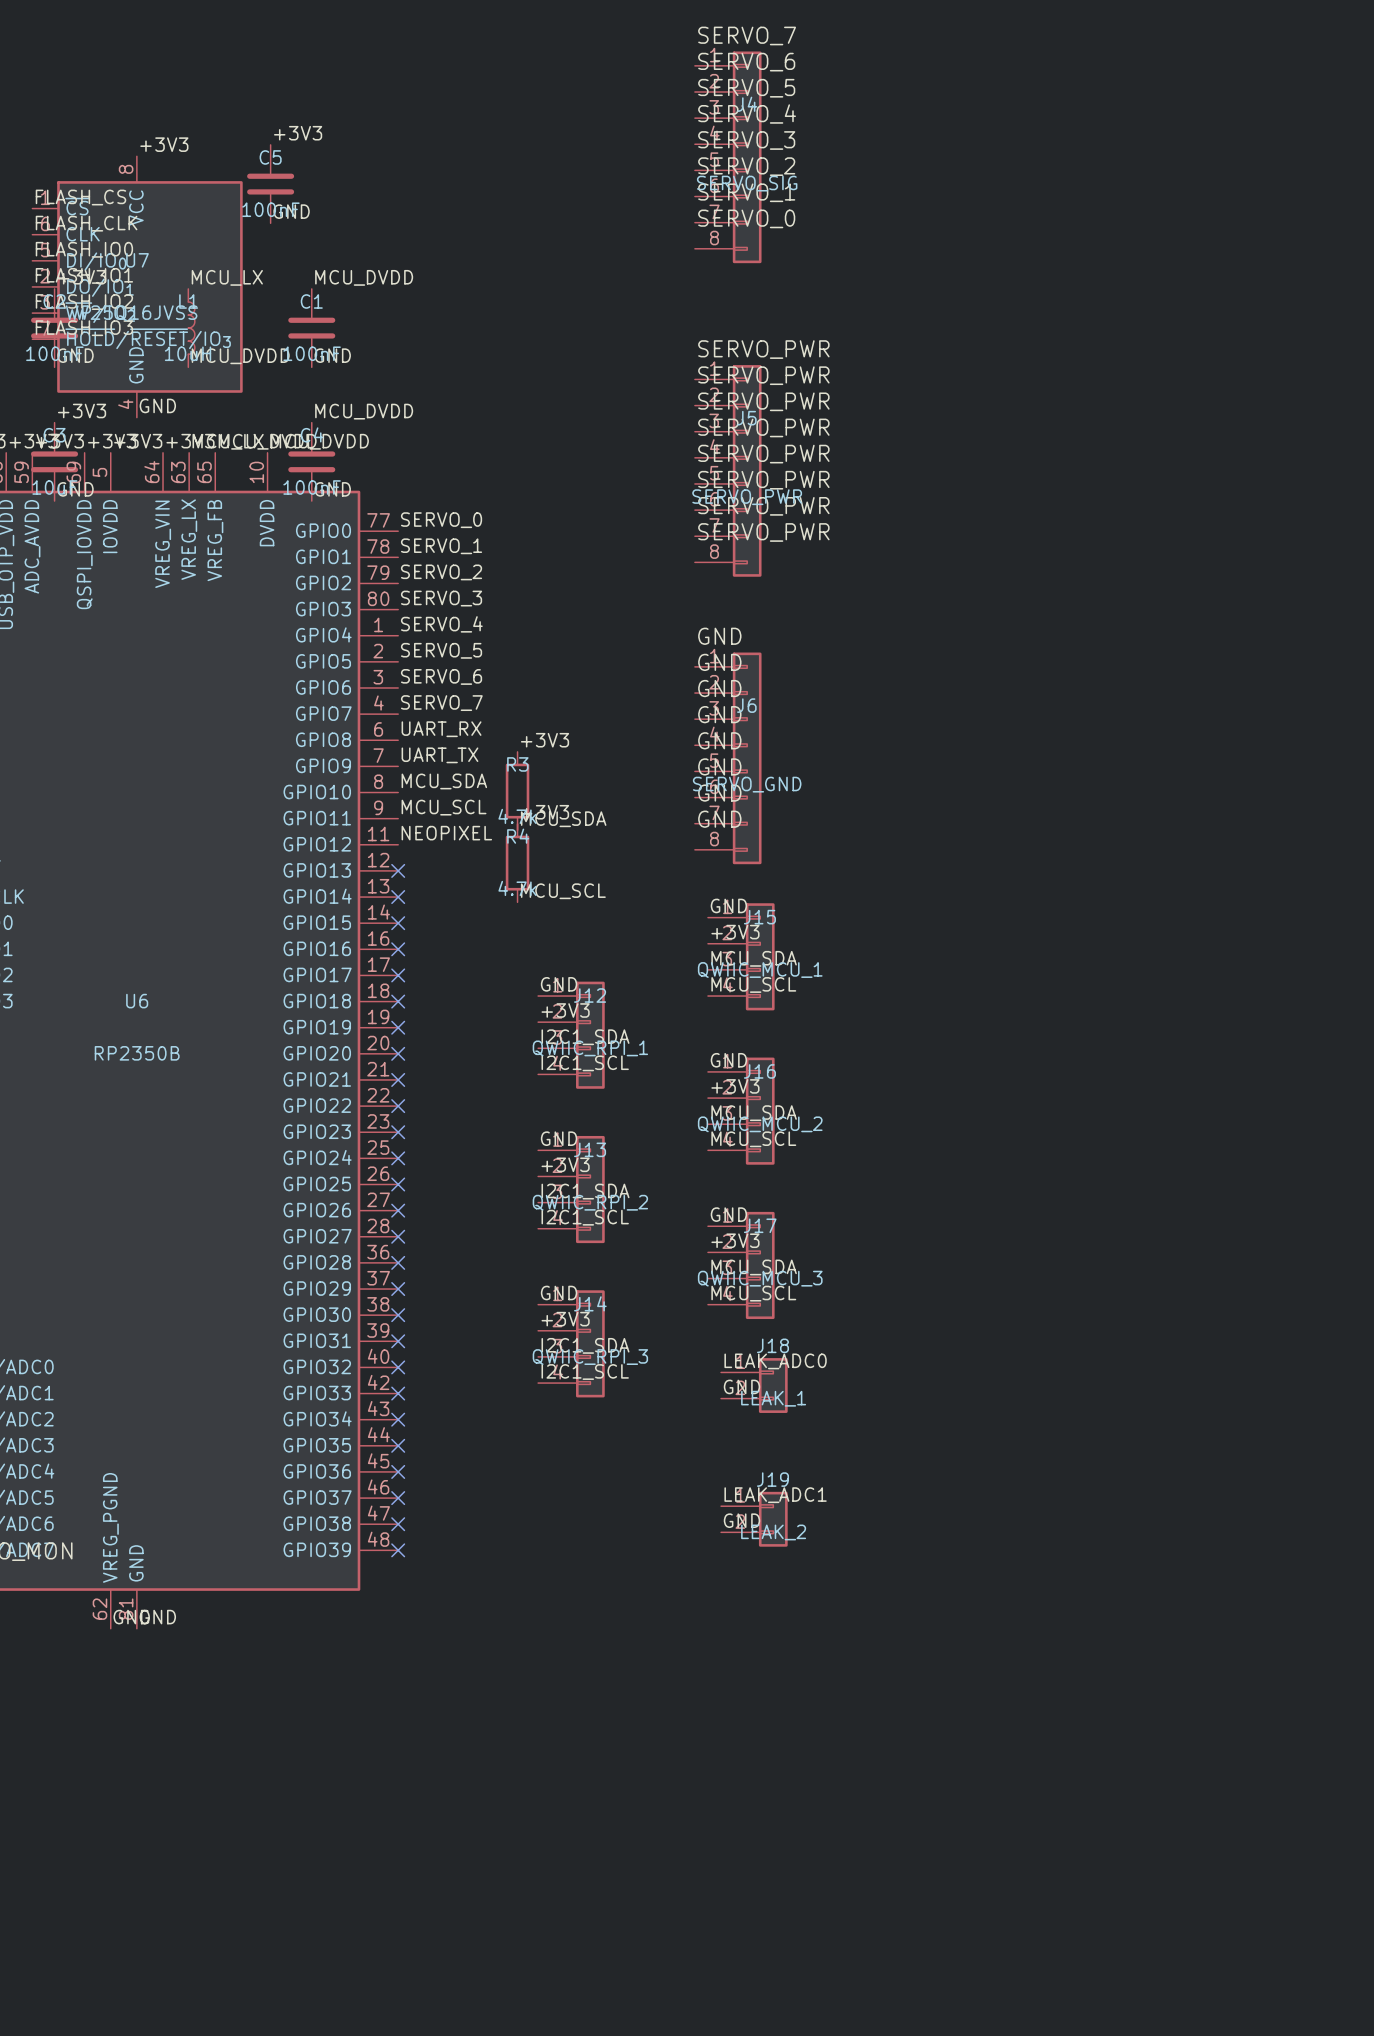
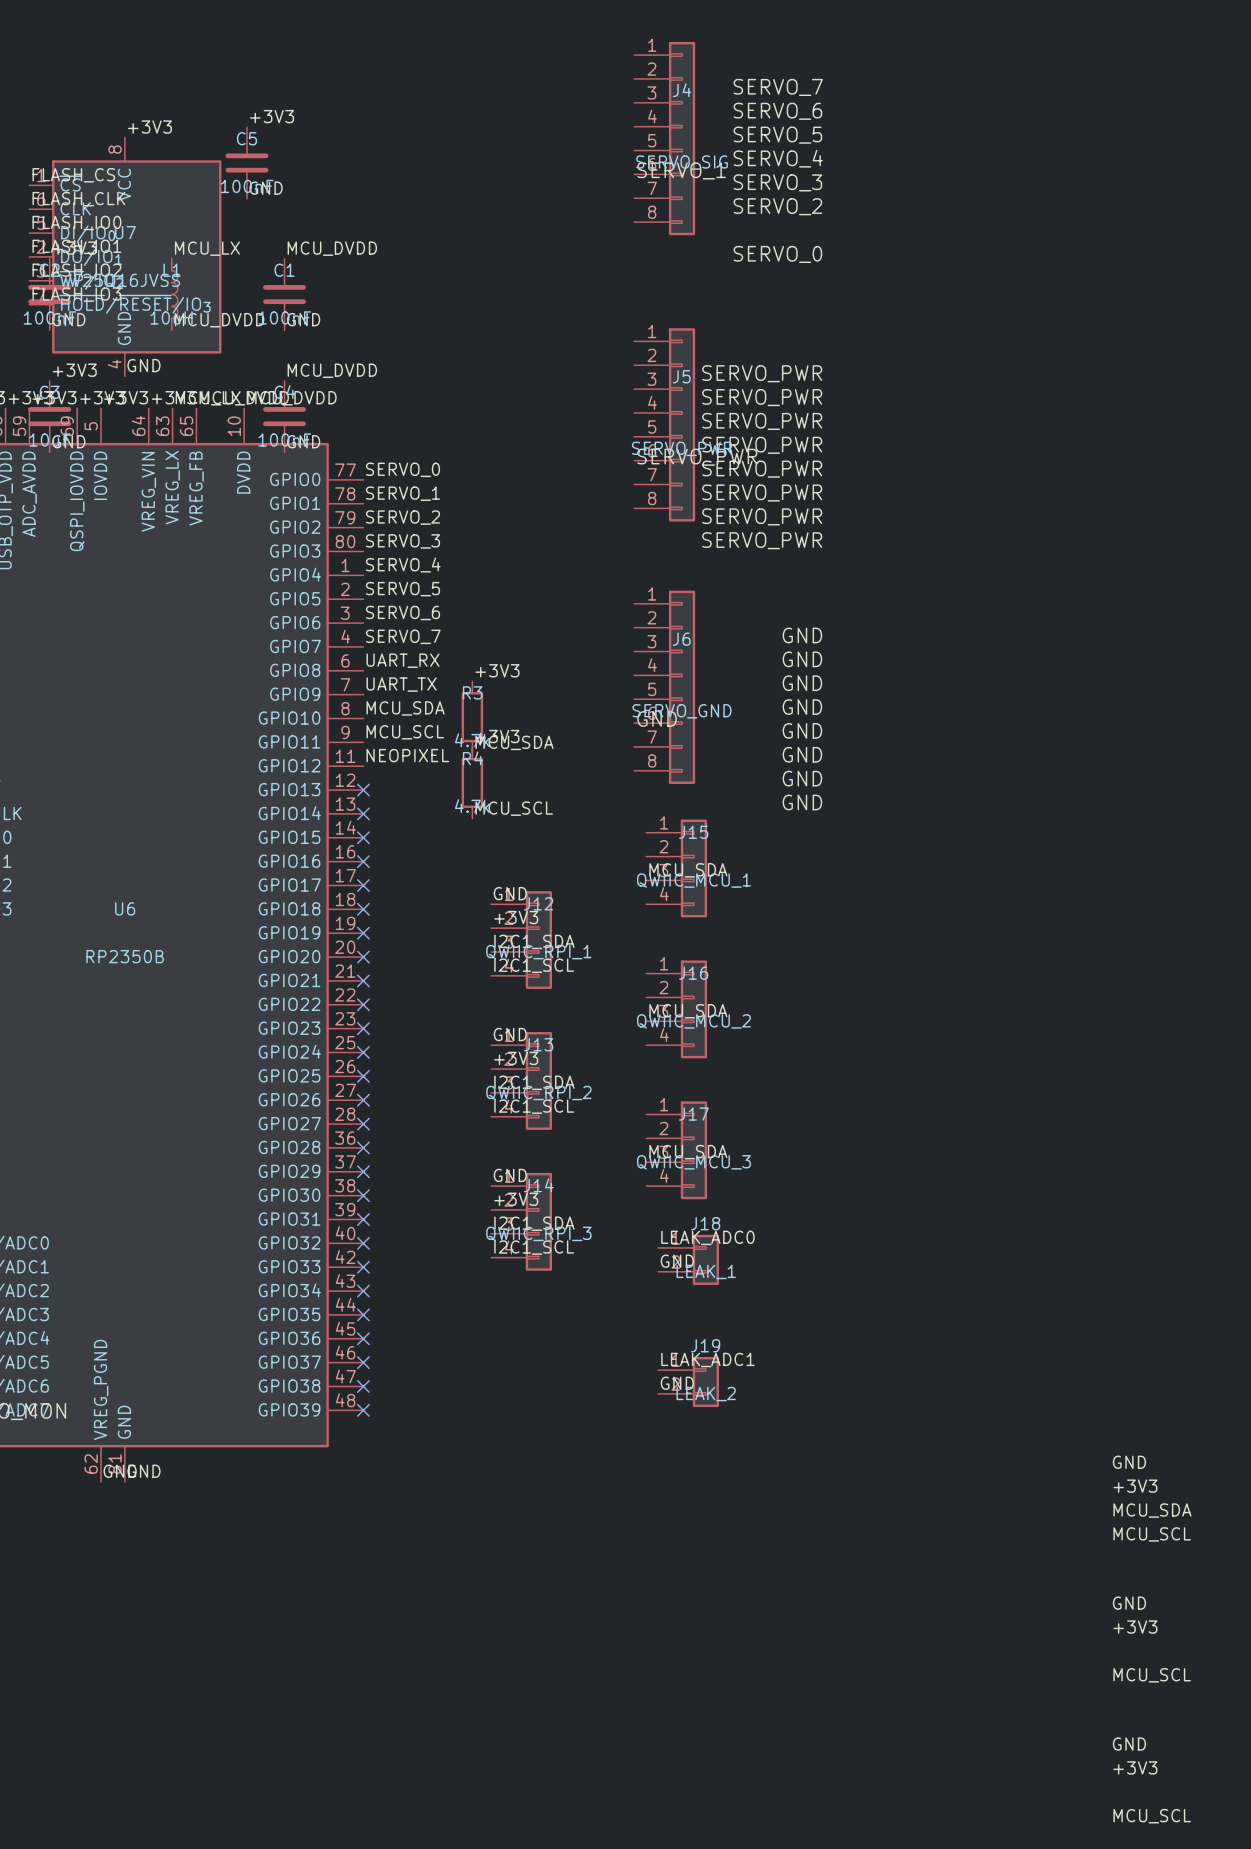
label position: SERVO_7 (747, 35) -> SERVO_7 (778, 87)
label position: SERVO_6 (746, 62) -> SERVO_6 (777, 111)
label position: SERVO_5 (746, 88) -> SERVO_5 (777, 135)
label position: SERVO_4 (747, 114) -> SERVO_4 (778, 158)
label position: SERVO_3 (746, 140) -> SERVO_3 (777, 182)
label position: SERVO_2 (746, 166) -> SERVO_2 (777, 206)
label position: SERVO_0 (746, 218) -> SERVO_0 (777, 254)
label: SERVO_PWR (763, 349) -> none
label: SERVO_PWR (763, 375) -> none
label: SERVO_PWR (763, 401) -> none
label: none -> SERVO_PWR (762, 373)
label: SERVO_PWR (763, 427) -> none
label: none -> SERVO_PWR (762, 397)
label: SERVO_PWR (763, 454) -> none
label: none -> SERVO_PWR (762, 421)
label: SERVO_PWR (763, 480) -> none
label: none -> SERVO_PWR (762, 445)
label: none -> SERVO_PWR (762, 469)
label: SERVO_PWR (763, 532) -> none
label: none -> SERVO_PWR (762, 493)
label: none -> SERVO_PWR (762, 516)
label: none -> SERVO_PWR (762, 540)
label: GND (719, 636) -> none
label: GND (719, 662) -> none
label: GND (719, 688) -> none
label: none -> GND (802, 635)
label: GND (719, 714) -> none
label: none -> GND (802, 659)
label: GND (719, 740) -> none
label: none -> GND (802, 683)
label: GND (719, 766) -> none
label: none -> GND (802, 707)
label: none -> GND (802, 730)
label: GND (719, 819) -> none
label: none -> GND (802, 754)
label: none -> GND (802, 778)
label: none -> GND (802, 802)
label: GND (728, 905) -> none
label: +3V3 (735, 932) -> none
label: MCU_SCL (753, 984) -> none
label: GND (728, 1060) -> none
label: +3V3 (735, 1086) -> none
label: MCU_SCL (753, 1139) -> none
label: GND (728, 1214) -> none
label: +3V3 (735, 1240) -> none
label: MCU_SCL (753, 1293) -> none
label: none -> GND (1129, 1462)
label: none -> +3V3 (1135, 1486)
label: none -> MCU_SDA (1152, 1510)
label: none -> MCU_SCL (1152, 1534)
label: none -> GND (1129, 1603)
label: none -> +3V3 (1135, 1627)
label: none -> MCU_SCL (1152, 1675)
label: none -> GND (1129, 1744)
label: none -> +3V3 (1135, 1767)
label: none -> MCU_SCL (1152, 1816)

